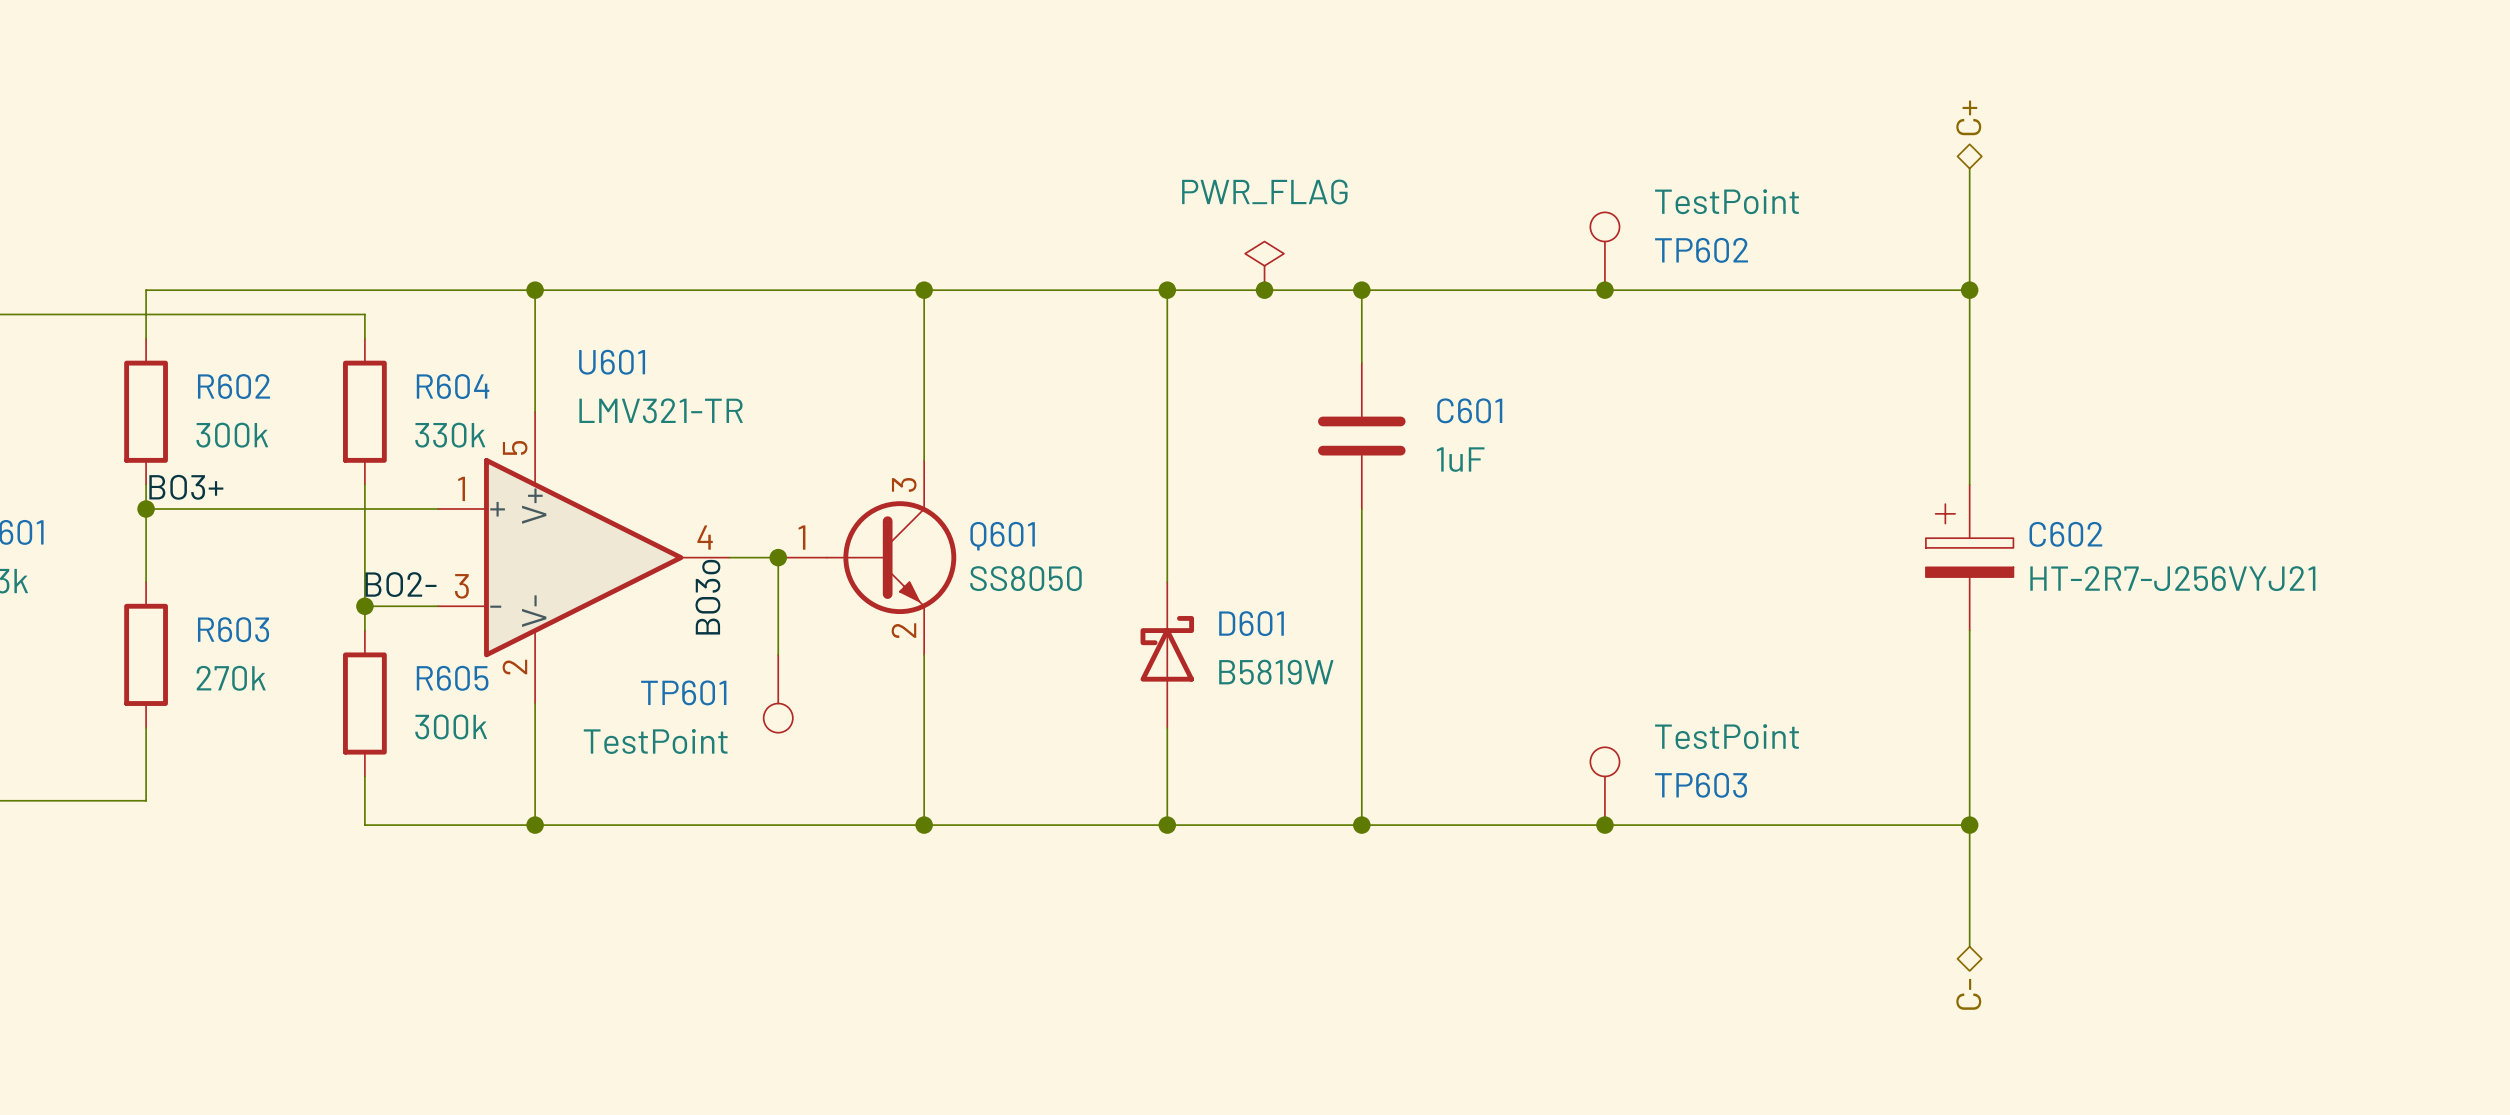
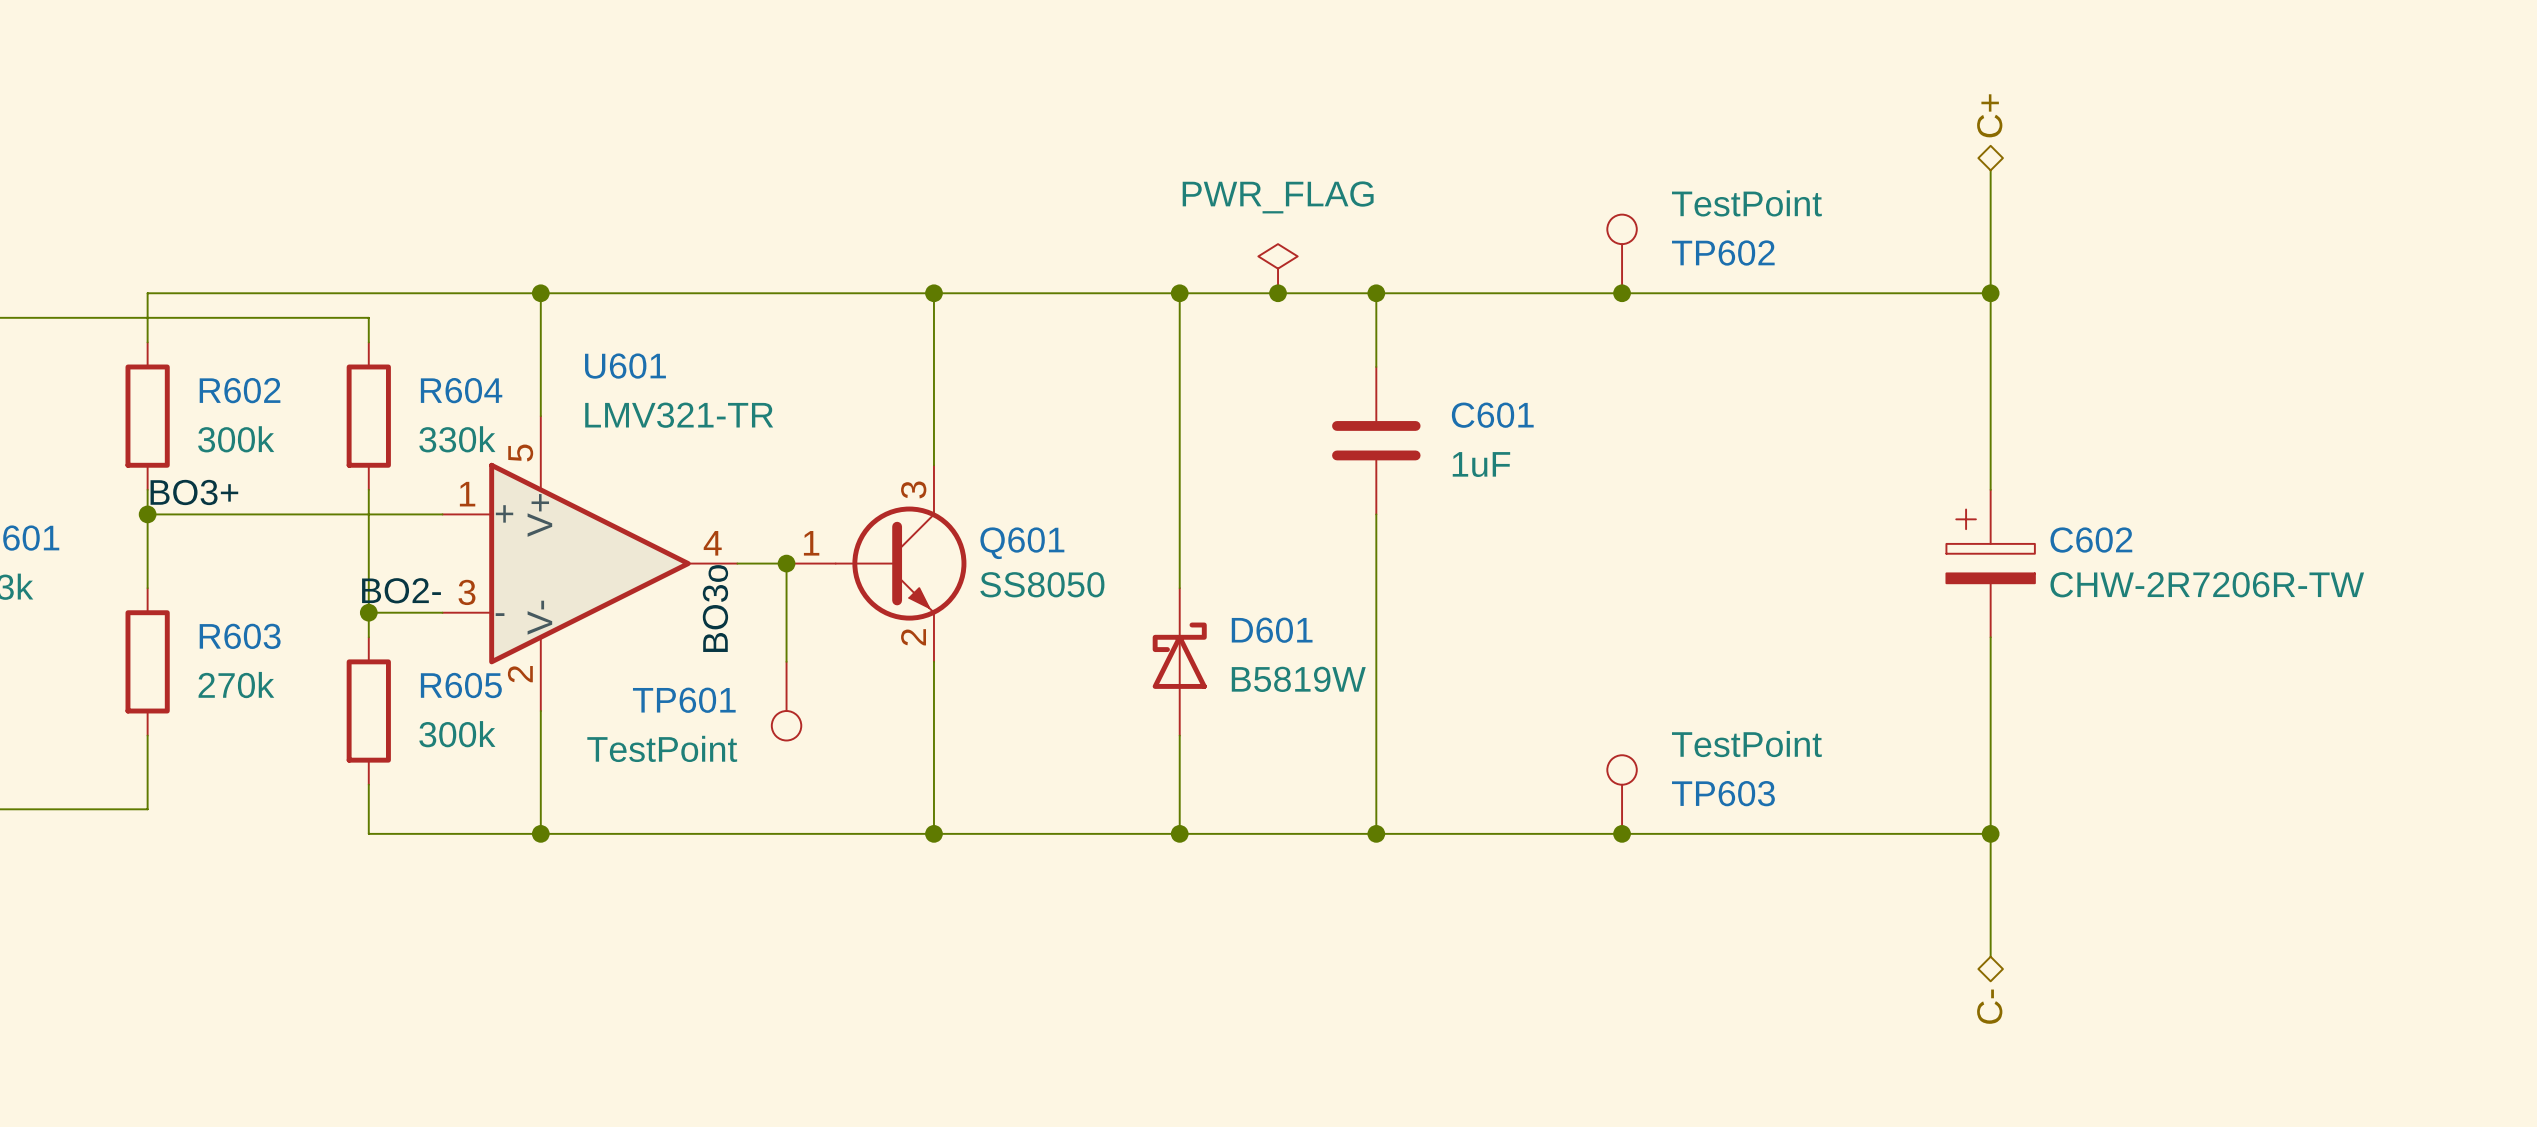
C602 value: HT-2R7-J256VYJ21 (2172, 578) -> CHW-2R7206R-TW (2207, 584)

